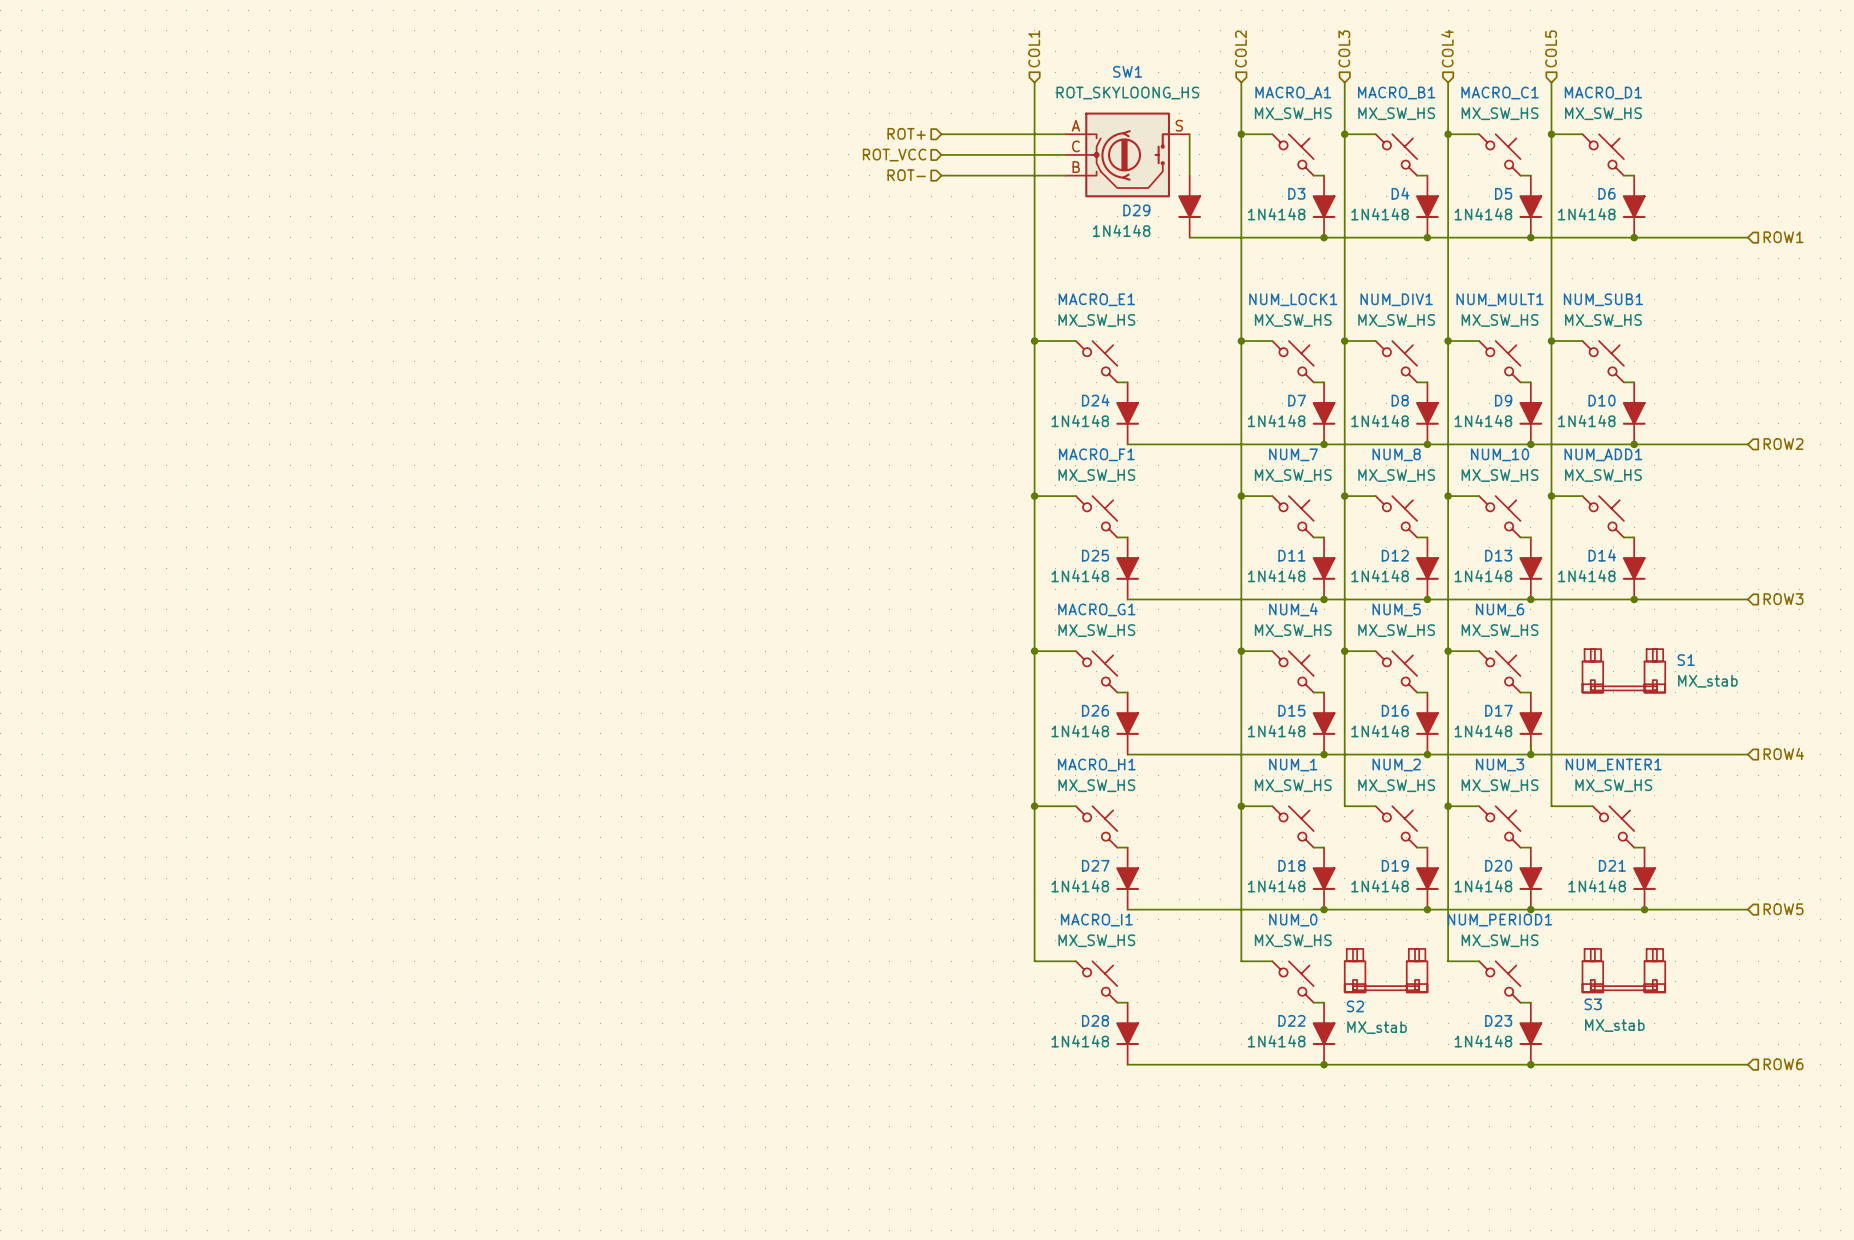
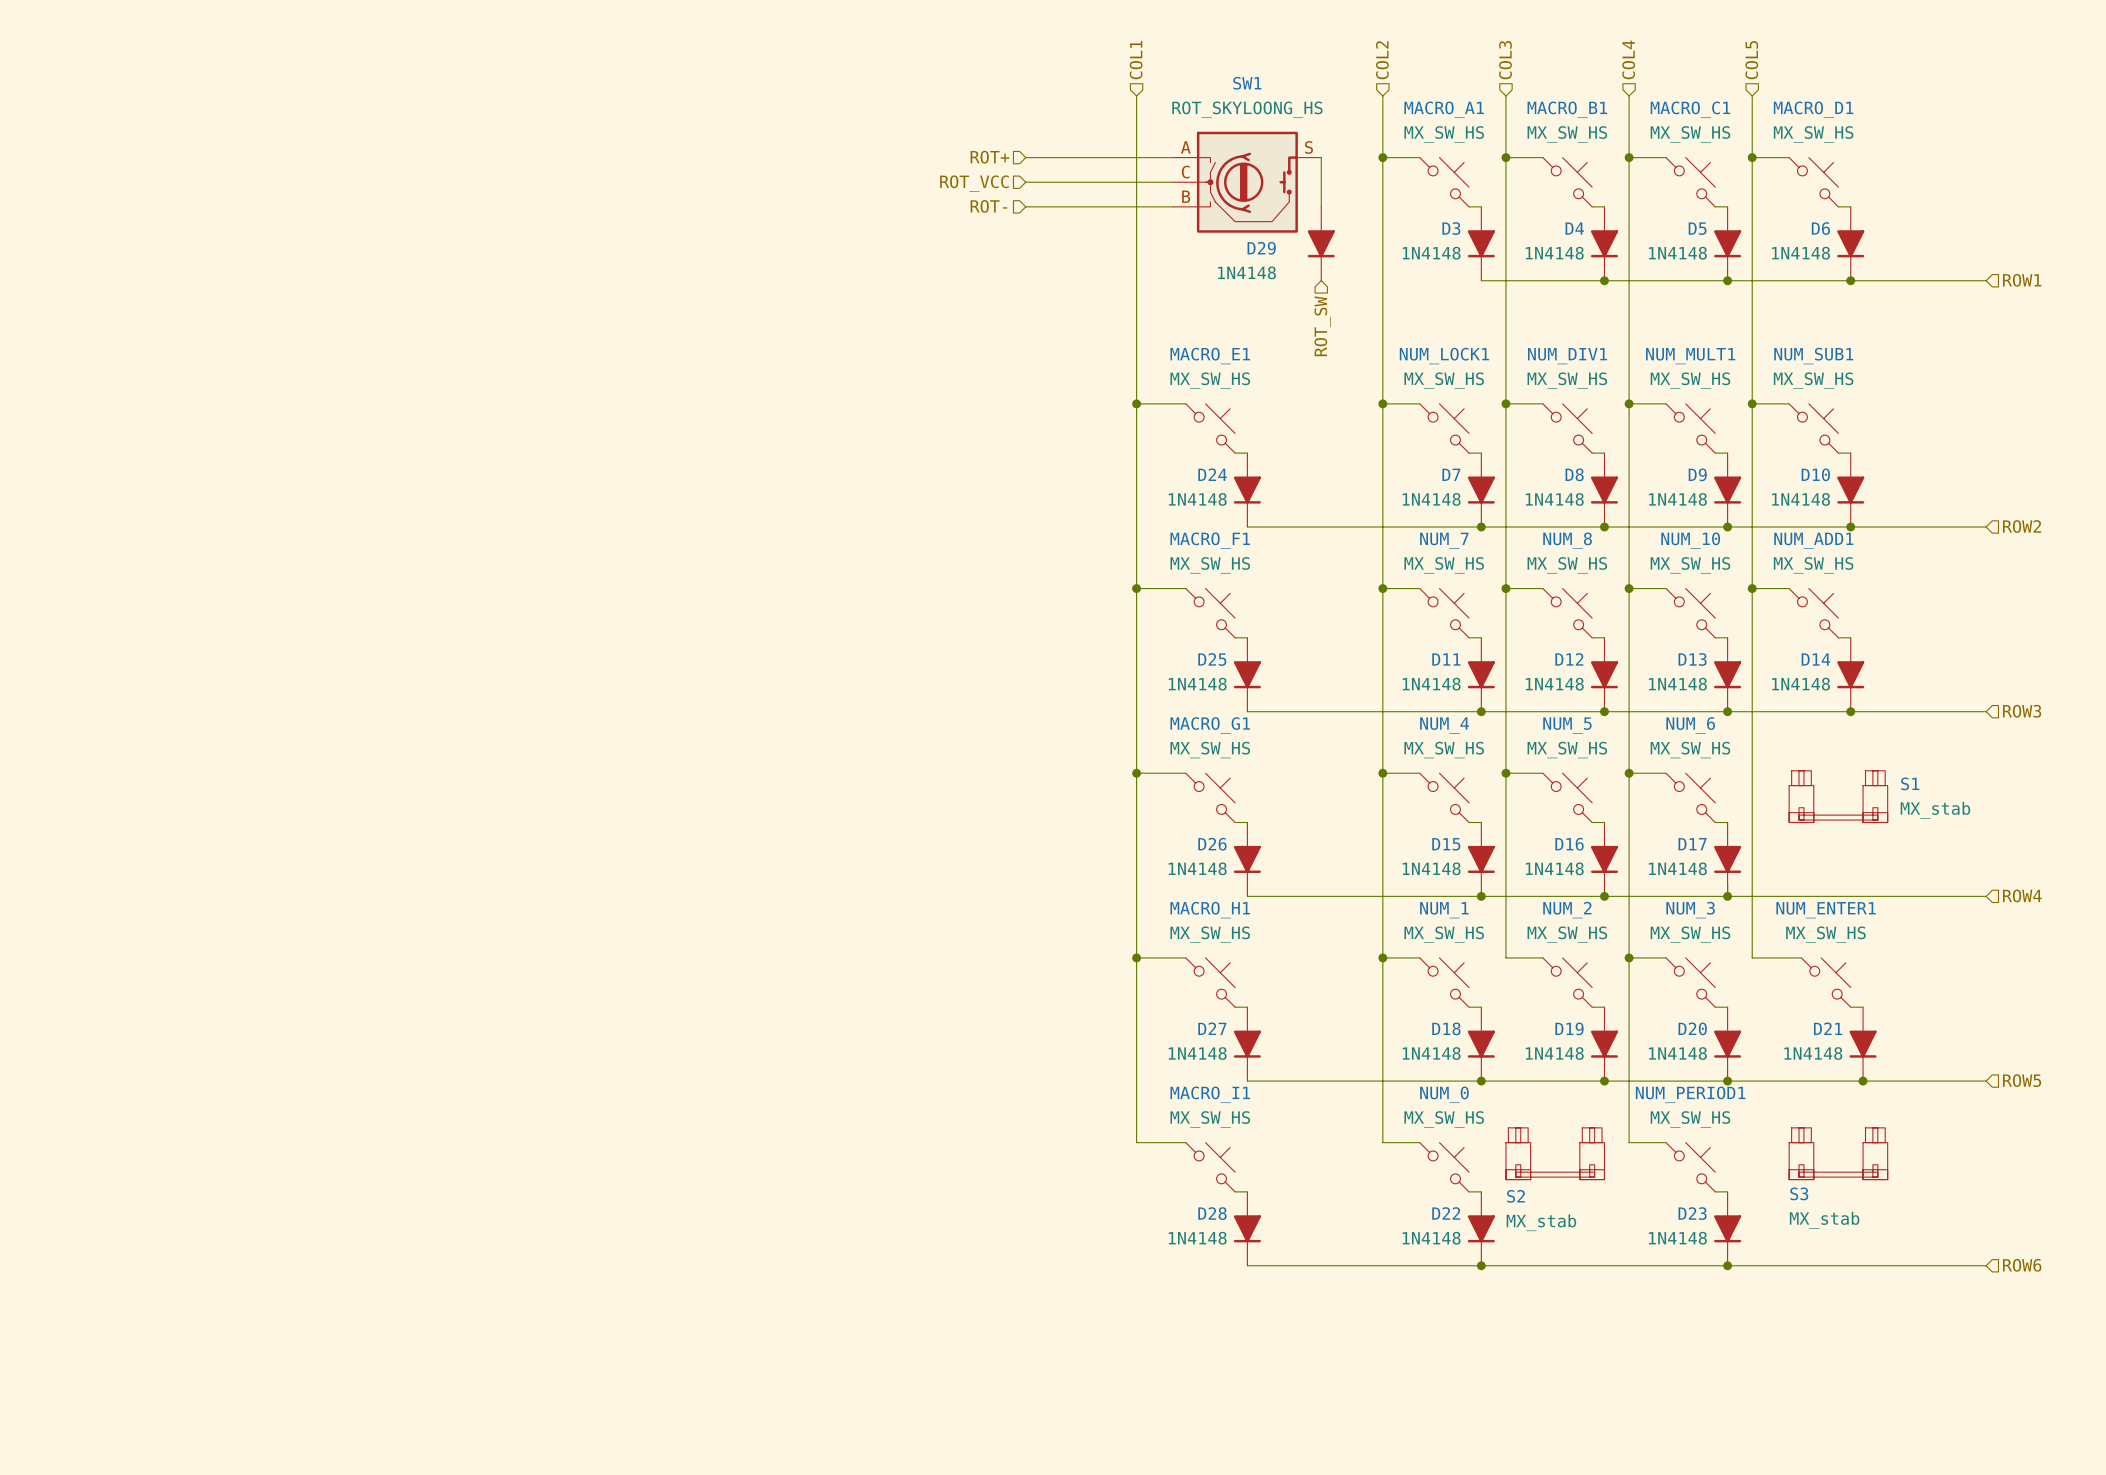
wire: (1189, 237) (1324, 237) -> none
junction: (1324, 237) -> none
hierarchical label: none -> ROT_SW (1322, 326)

